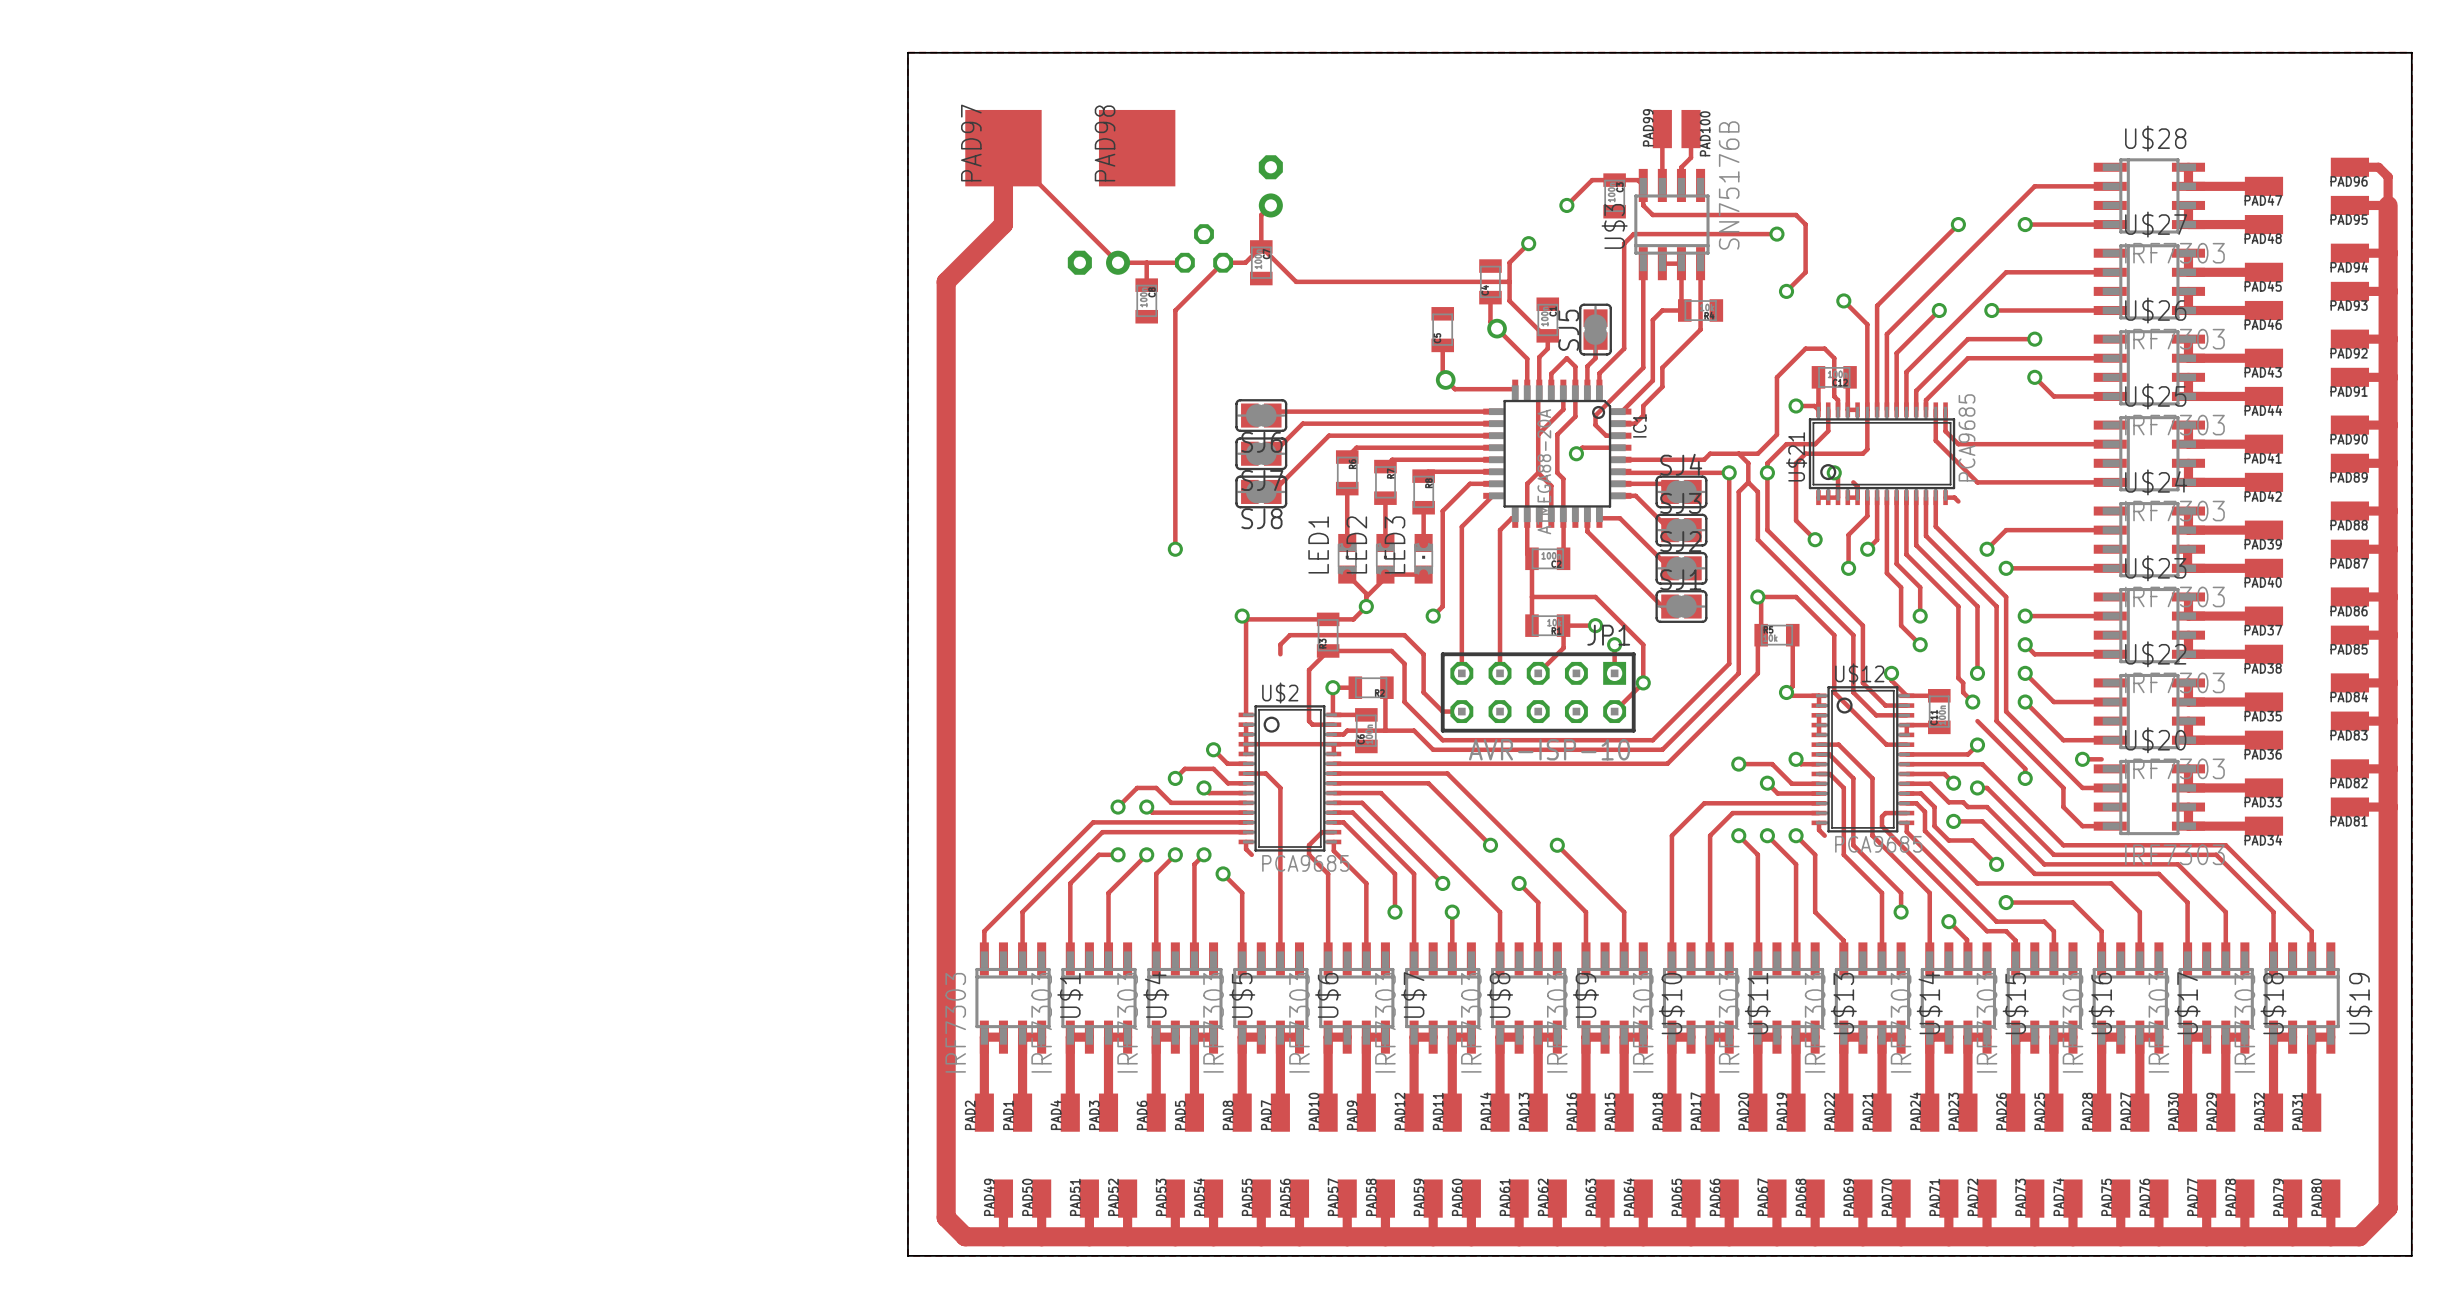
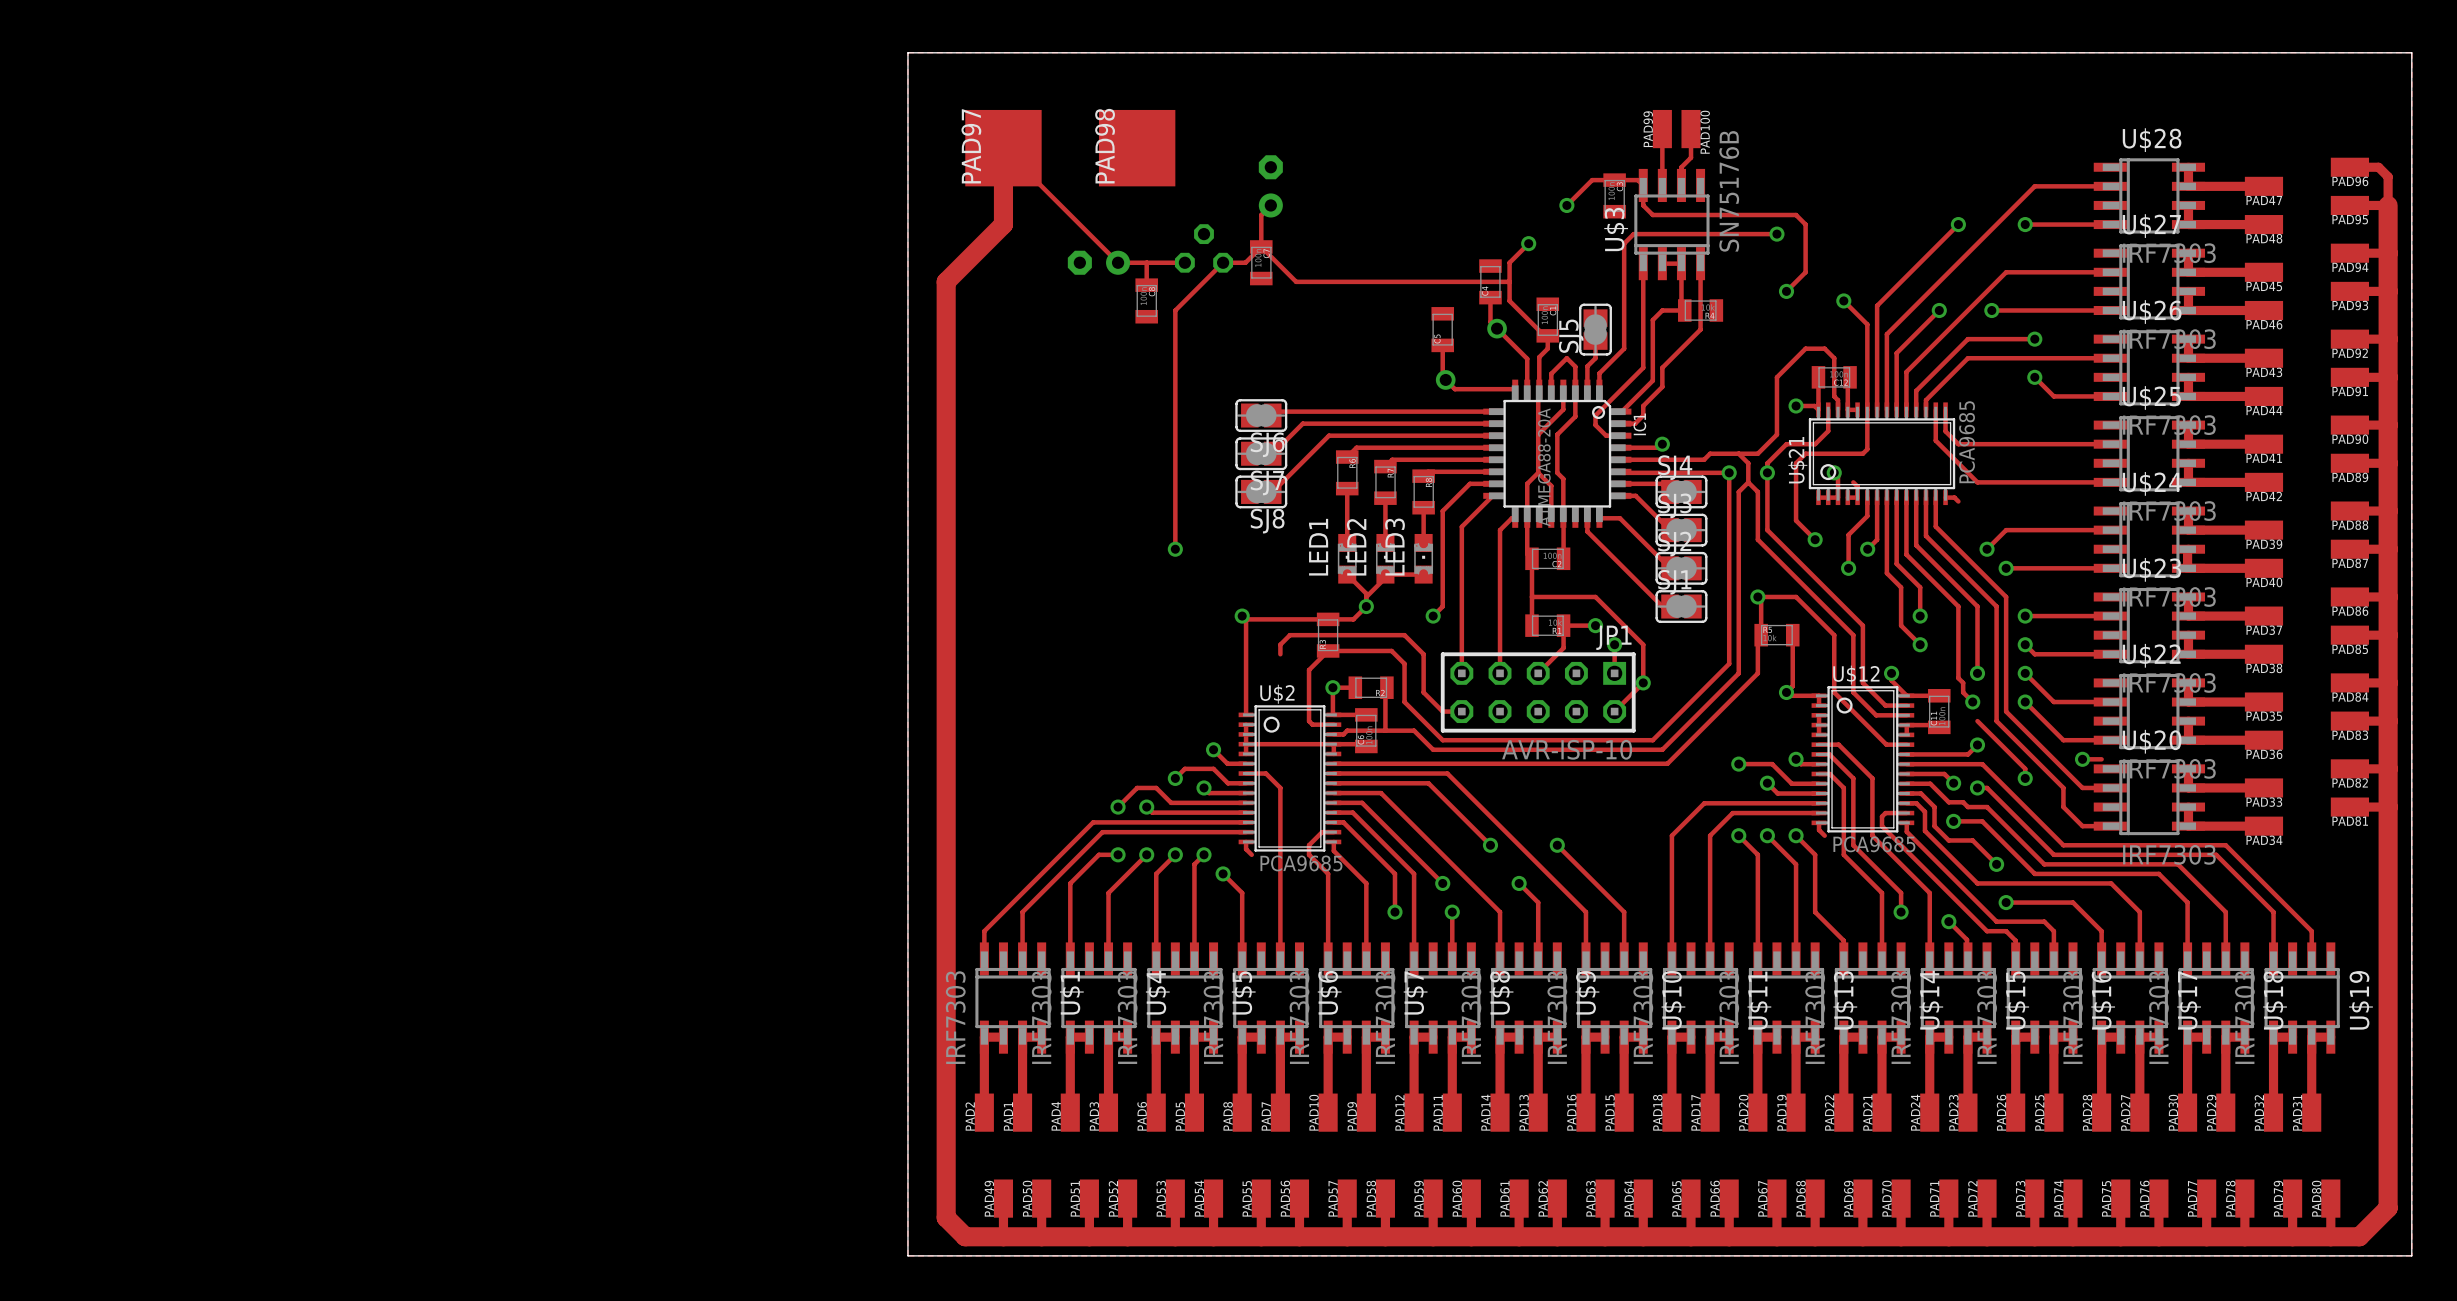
track: (1621, 447) (1582, 447) (1576, 453) -> (1621, 447) (1658, 447) (1662, 444)
via position: (1576, 453) -> (1662, 444)

